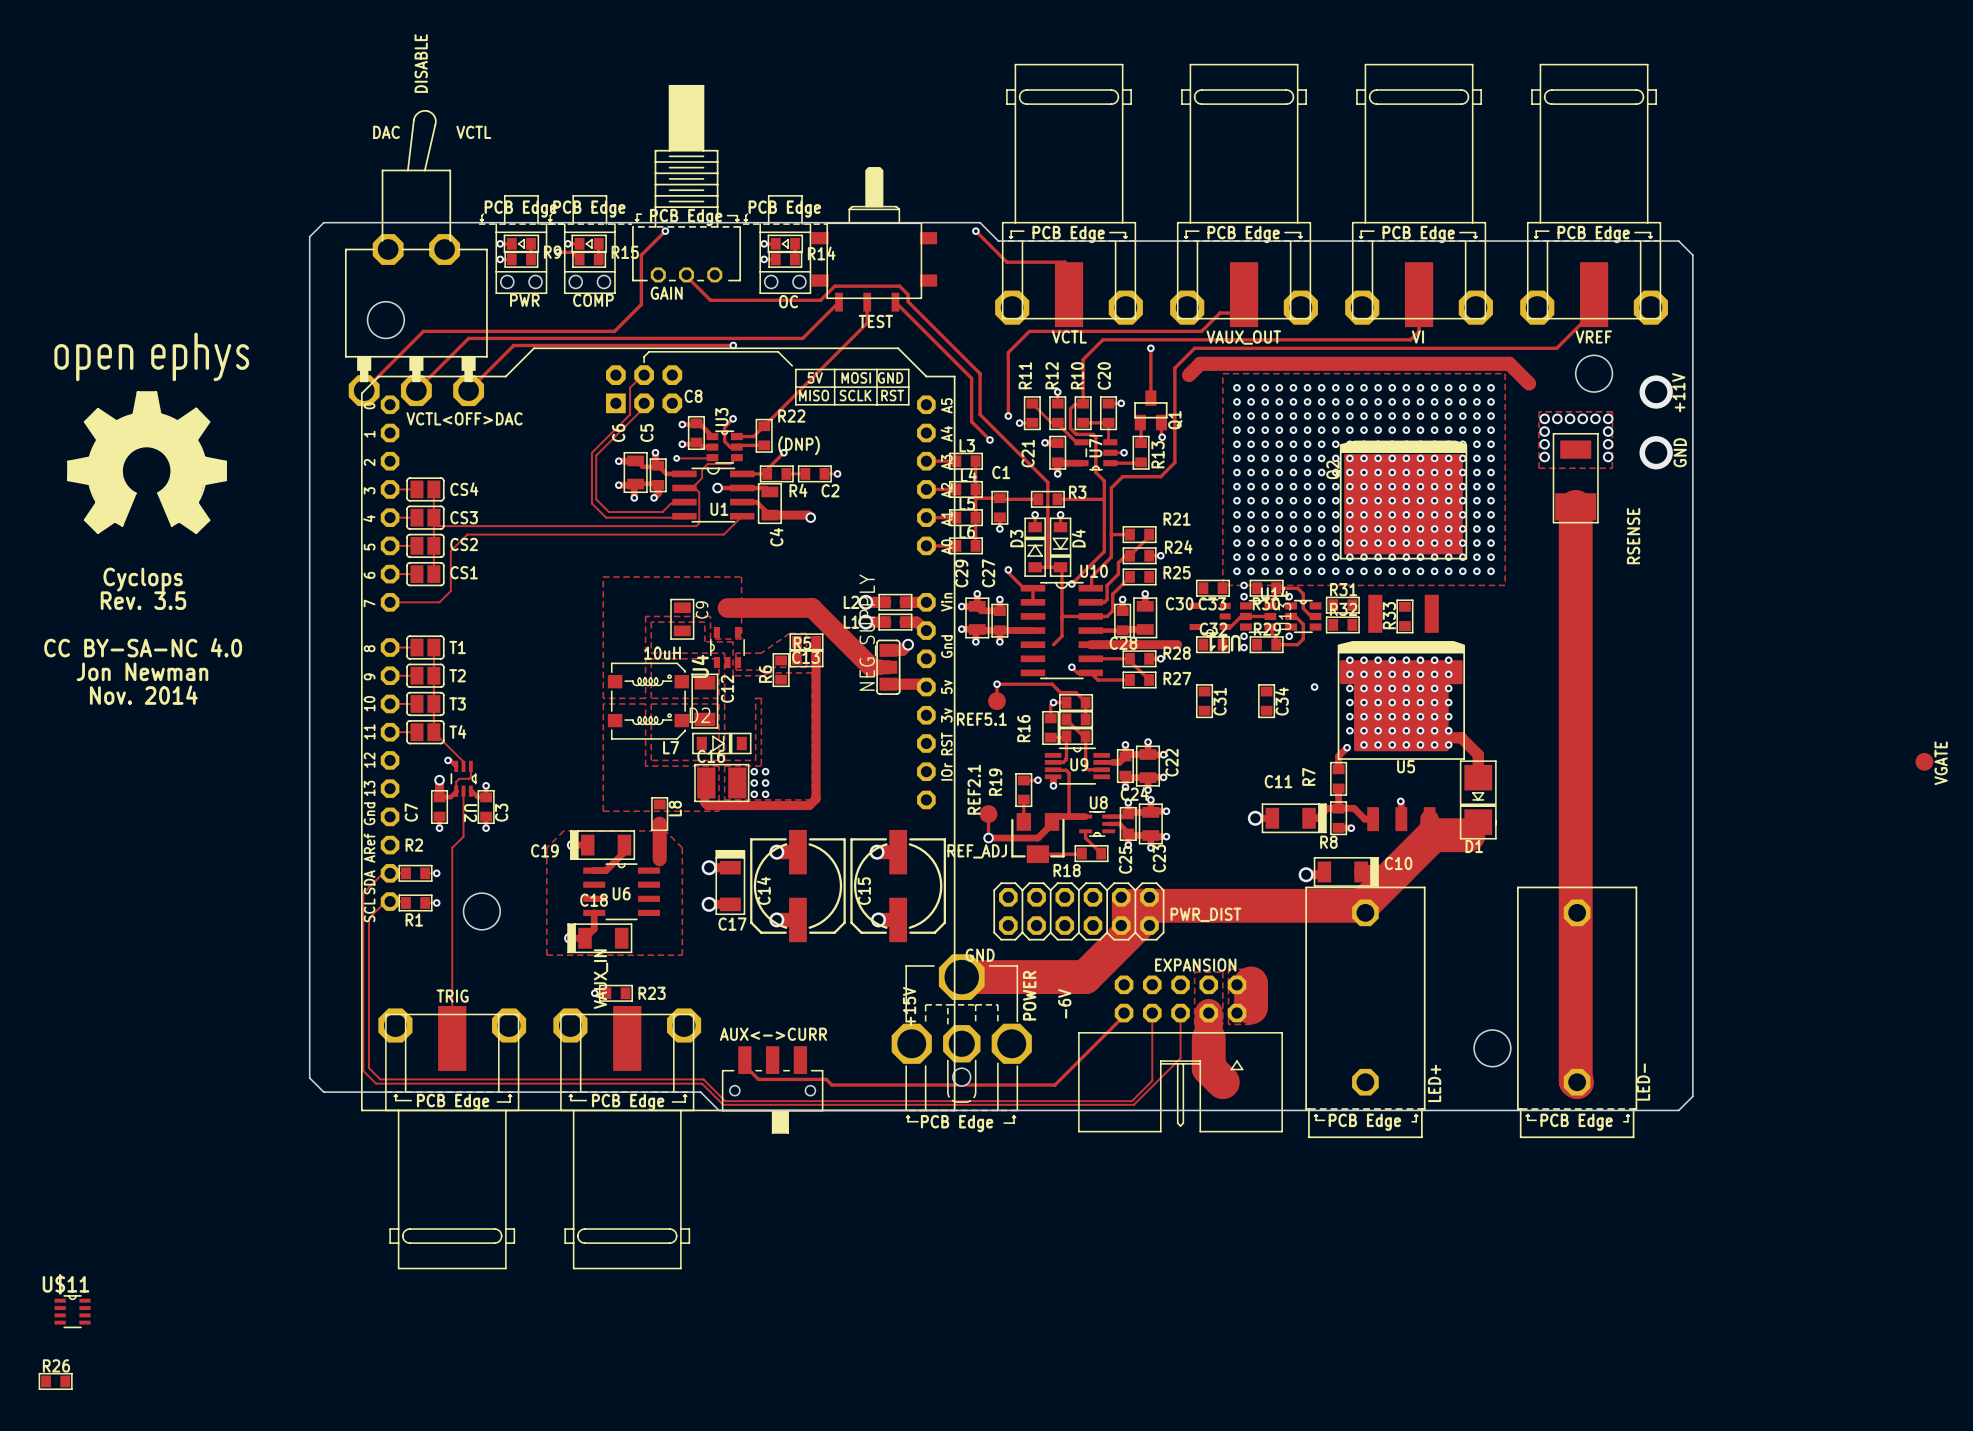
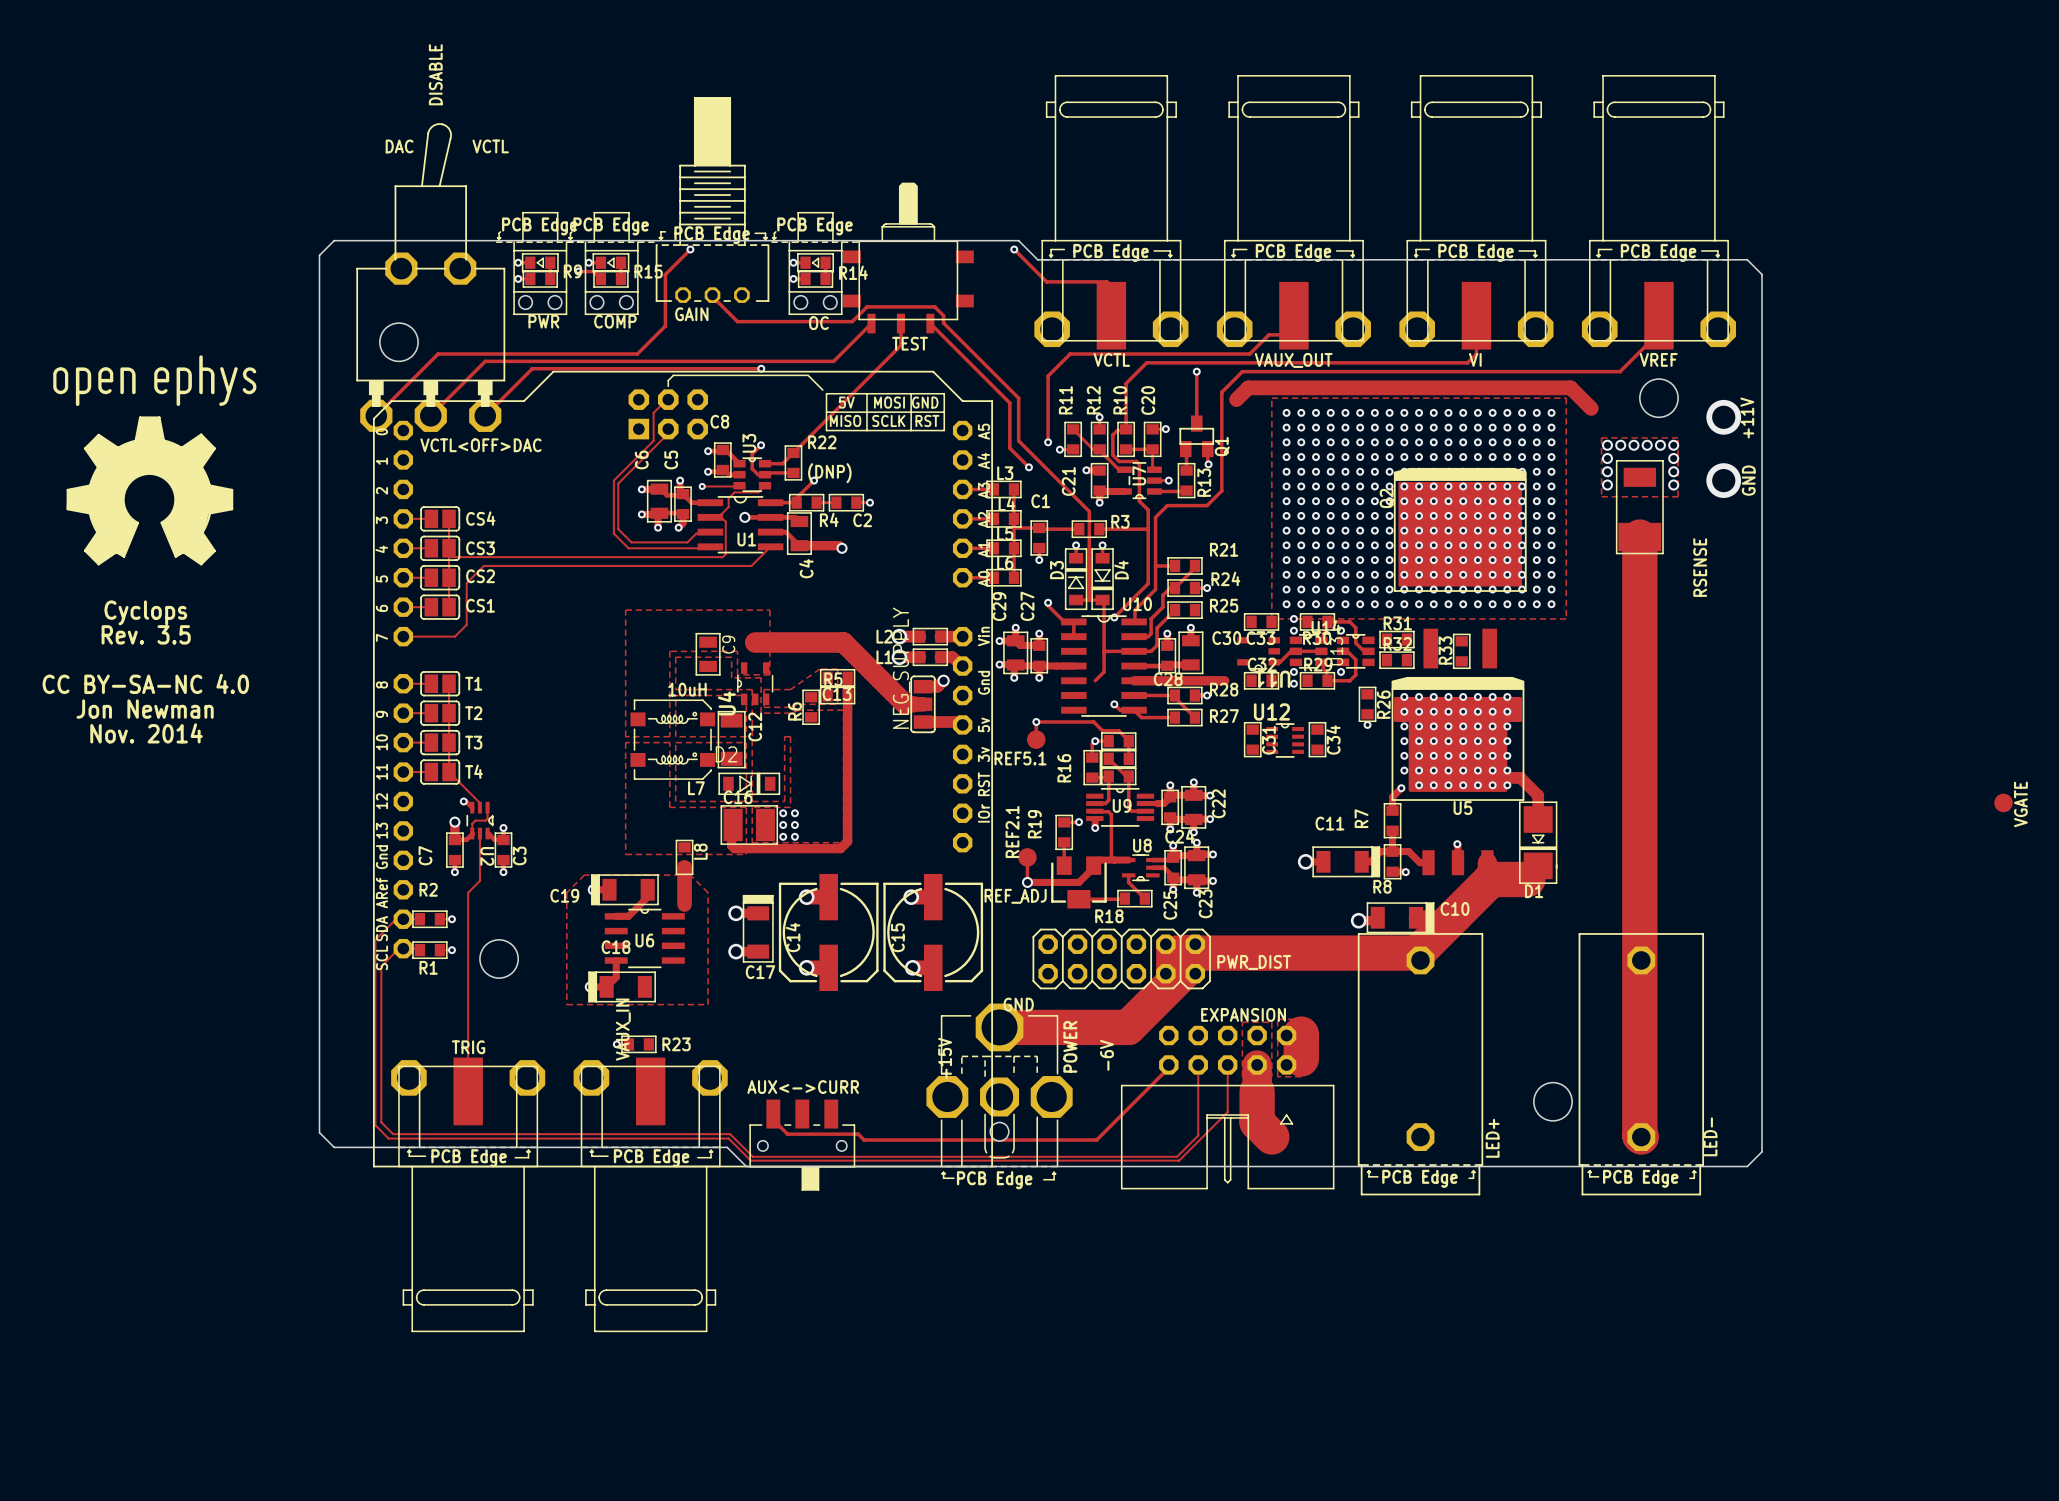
U12: none -> (1285, 740)
U$11: (72, 1311) -> none
R26 rotation: 0° (55, 1381) -> 90° clockwise (1367, 704)
R26 position: (55, 1381) -> (1367, 704)

